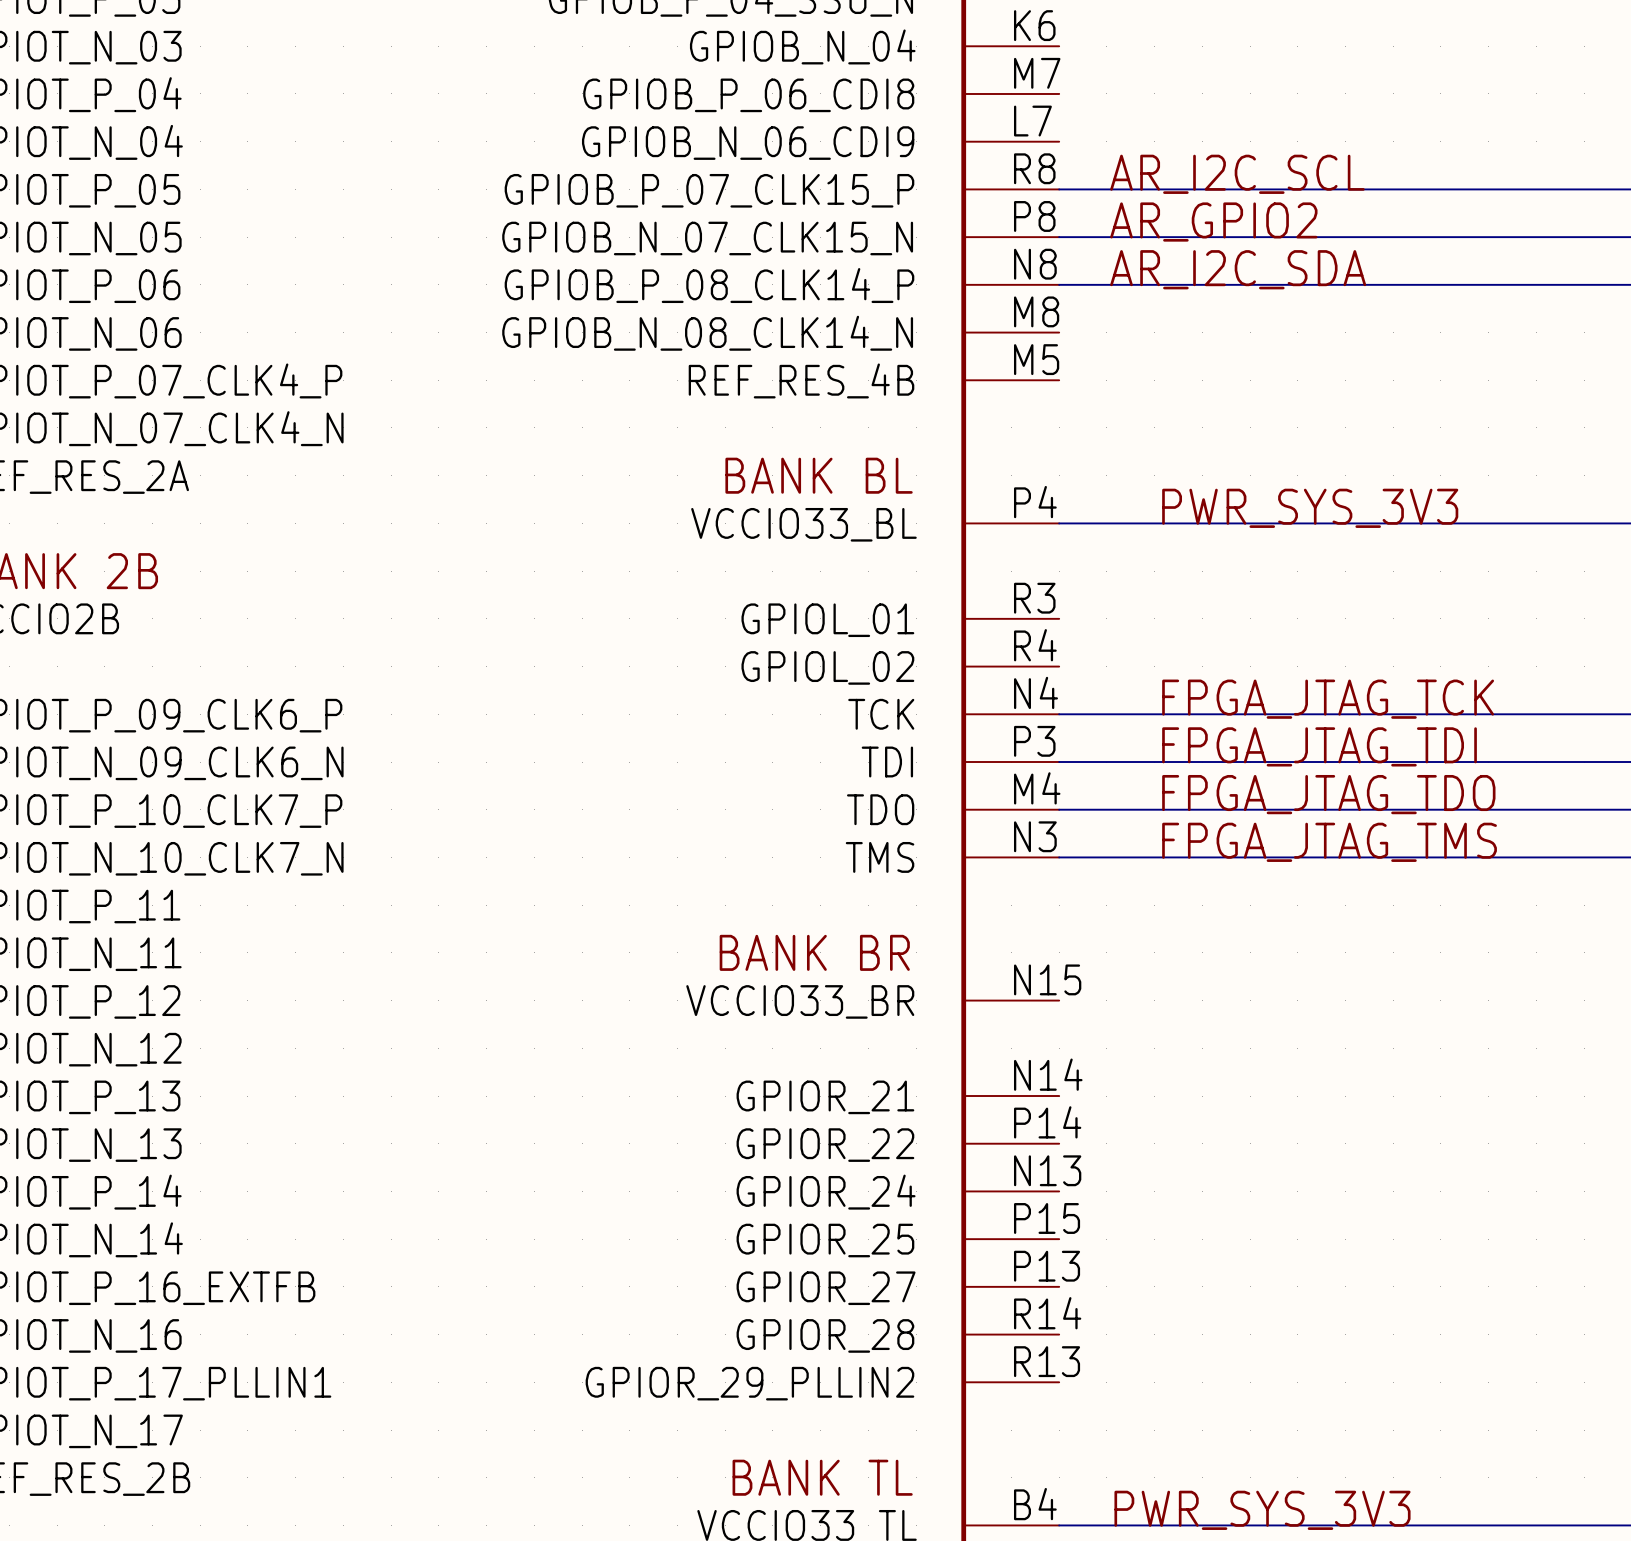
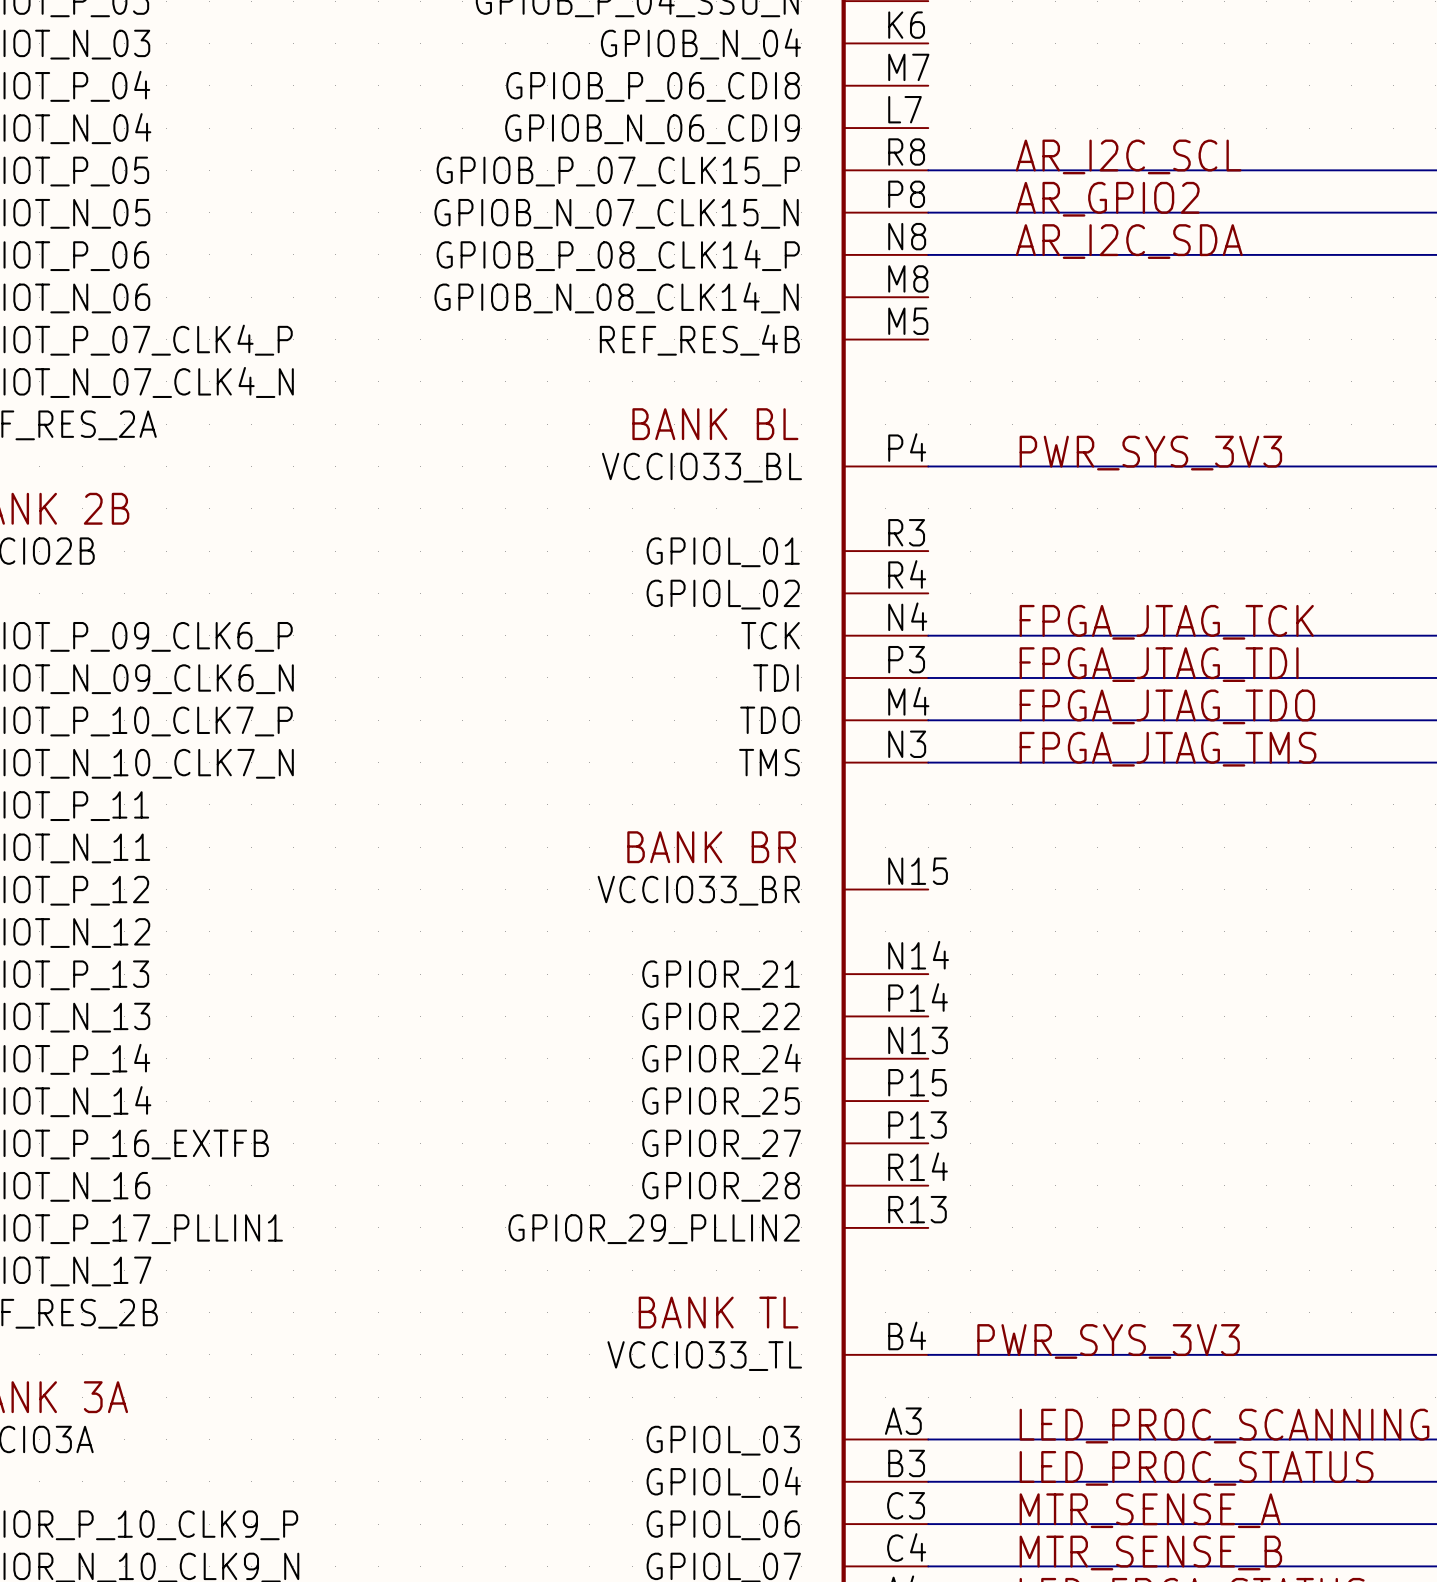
label position: AR_I2C_SCL (1237, 174) -> AR_I2C_SCL (1128, 156)
label position: AR_GPIO2 (1213, 222) -> AR_GPIO2 (1107, 199)
label position: AR_I2C_SDA (1238, 269) -> AR_I2C_SDA (1129, 241)

